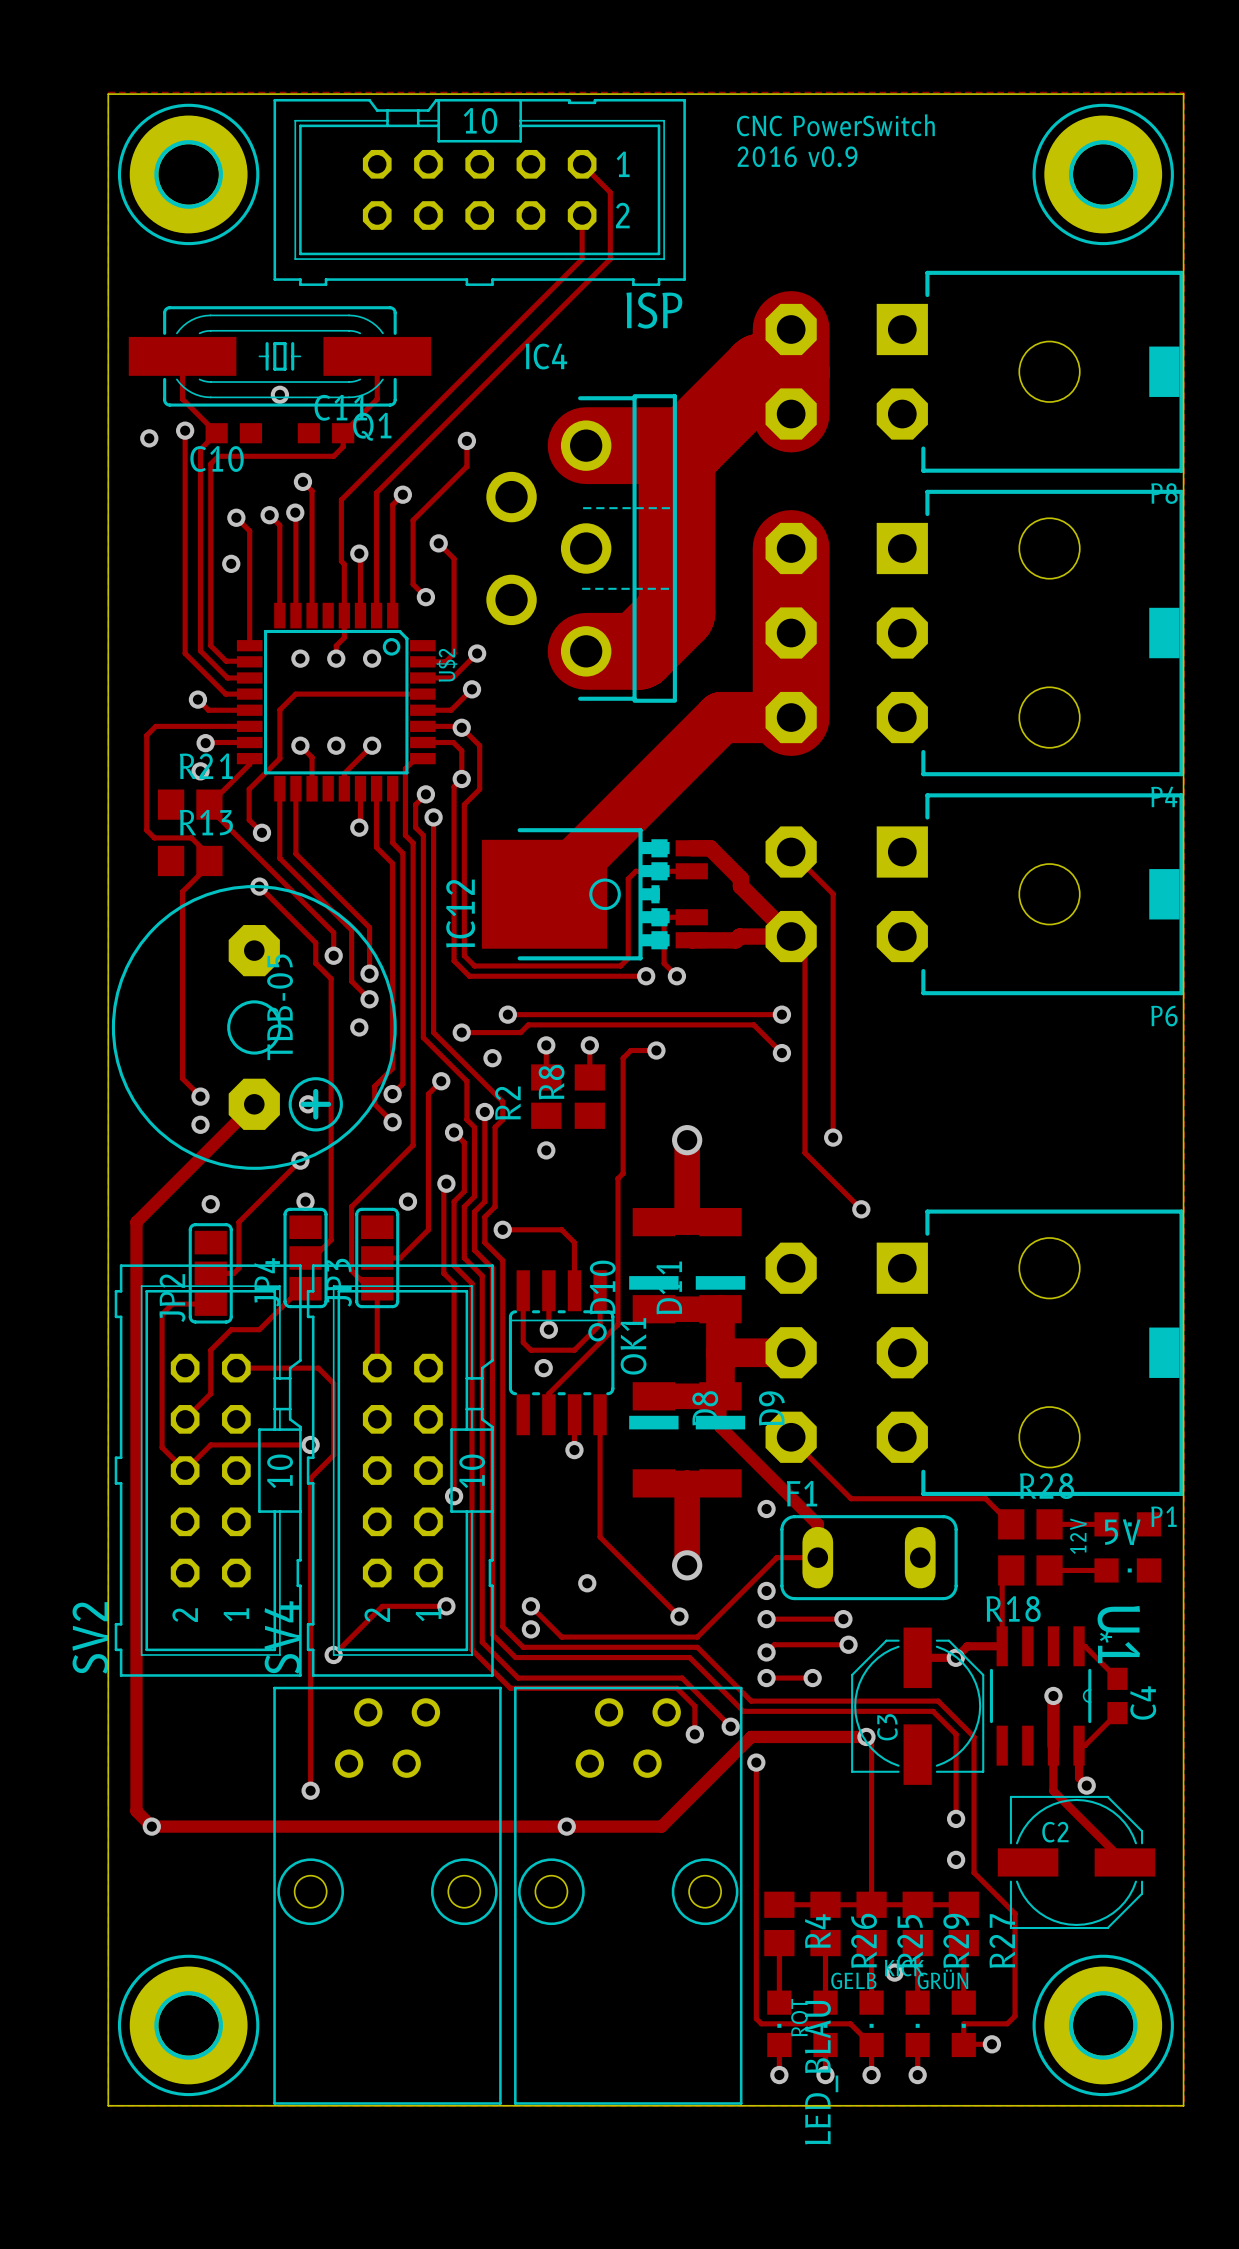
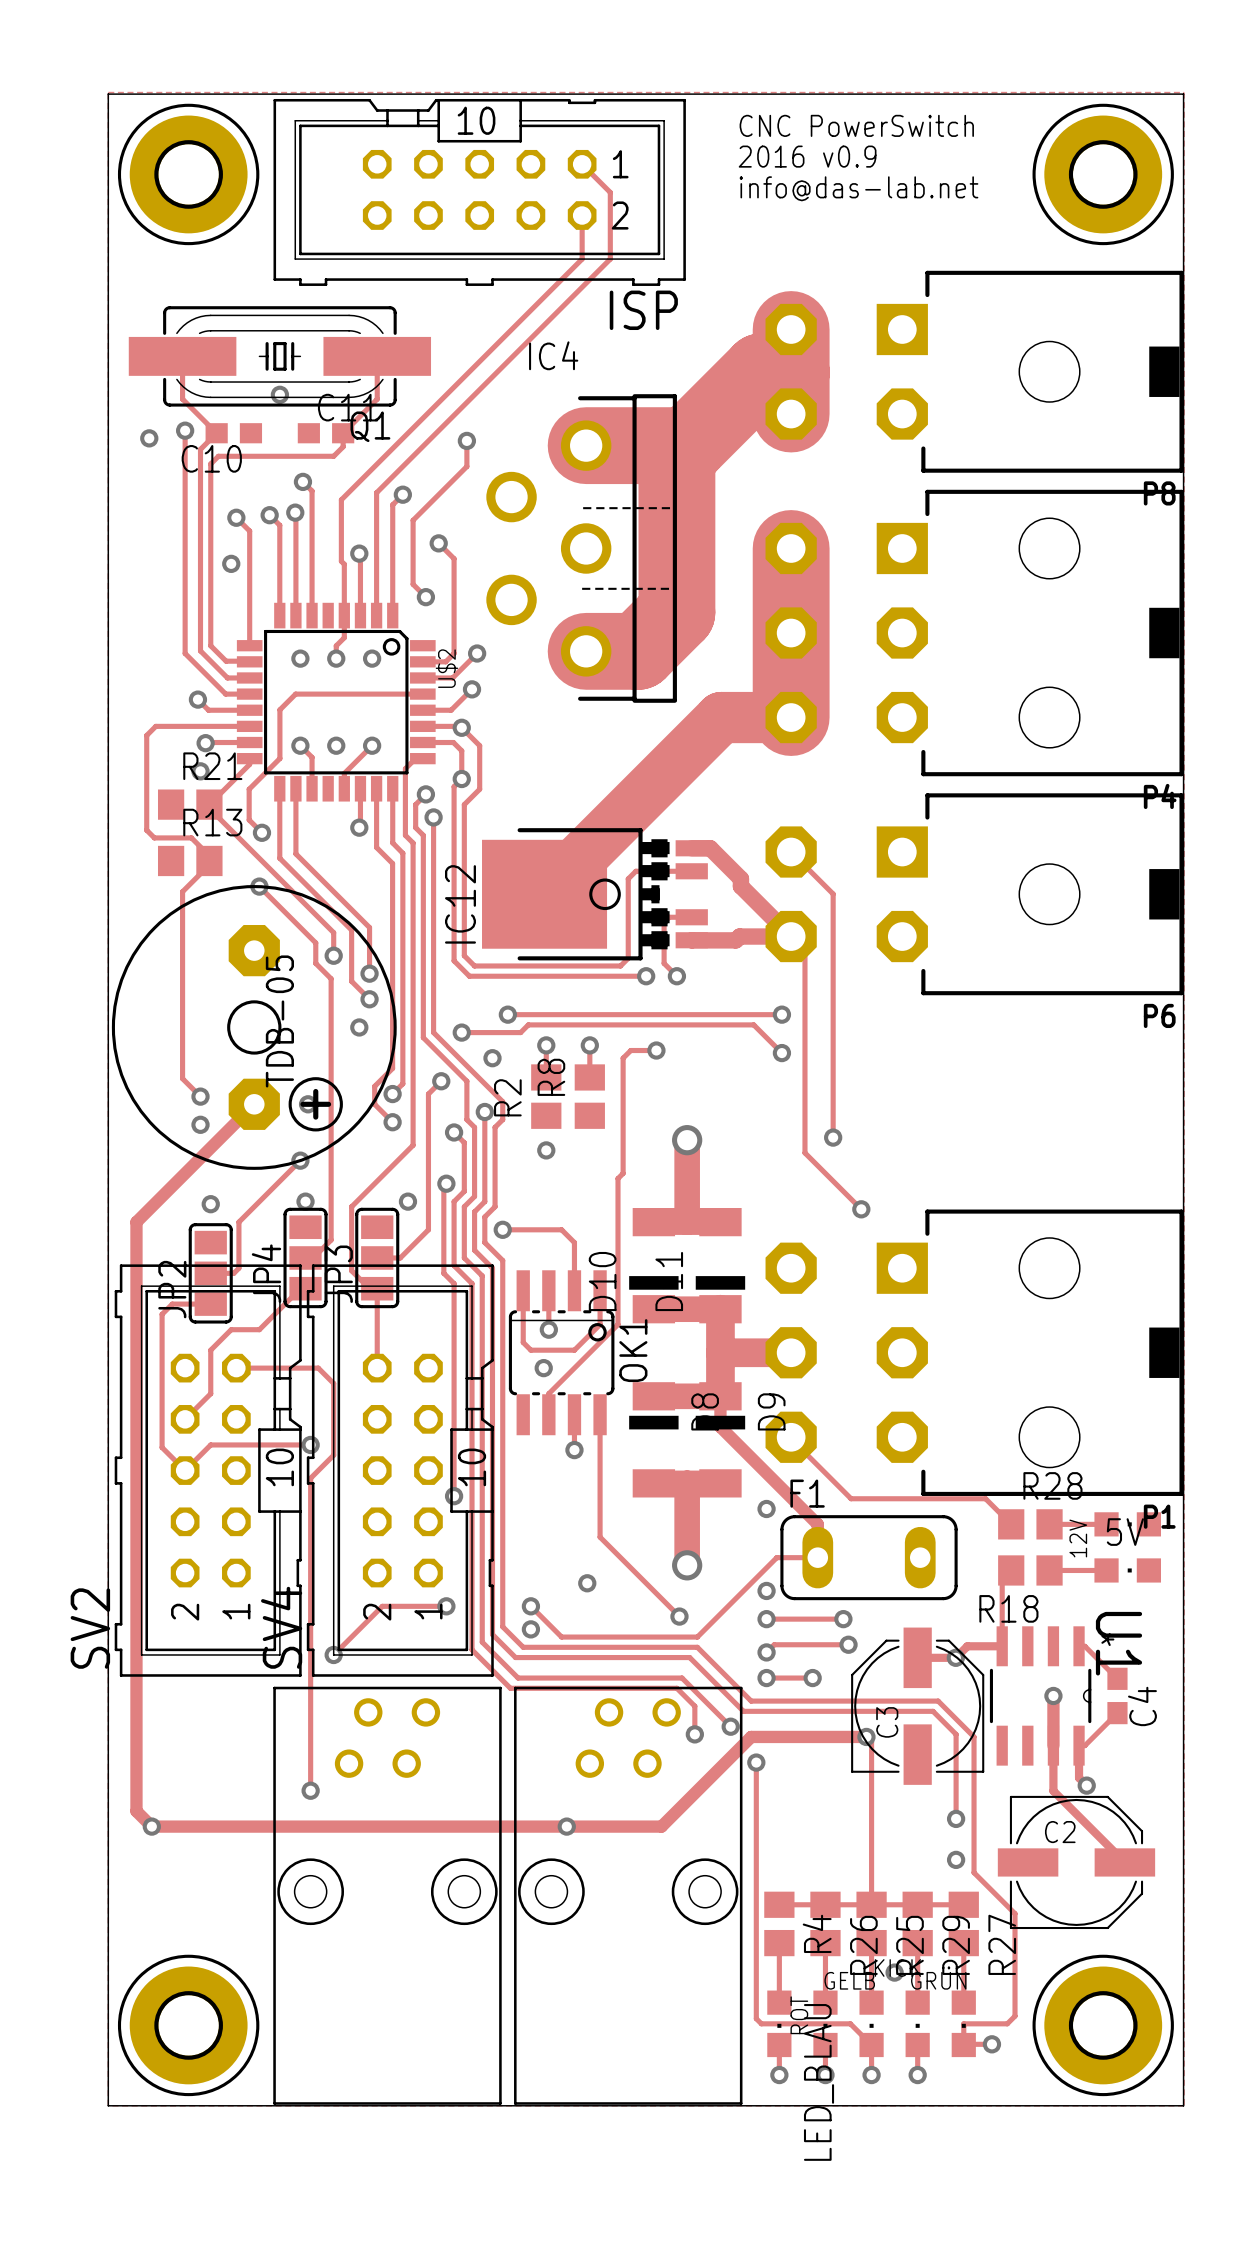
text: none -> info@das-lab.net (858, 188)

